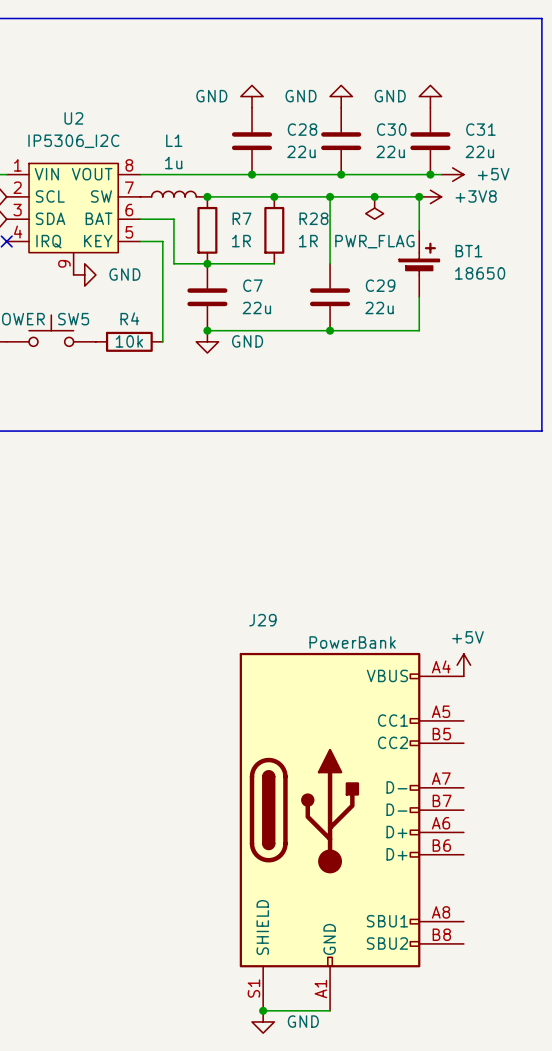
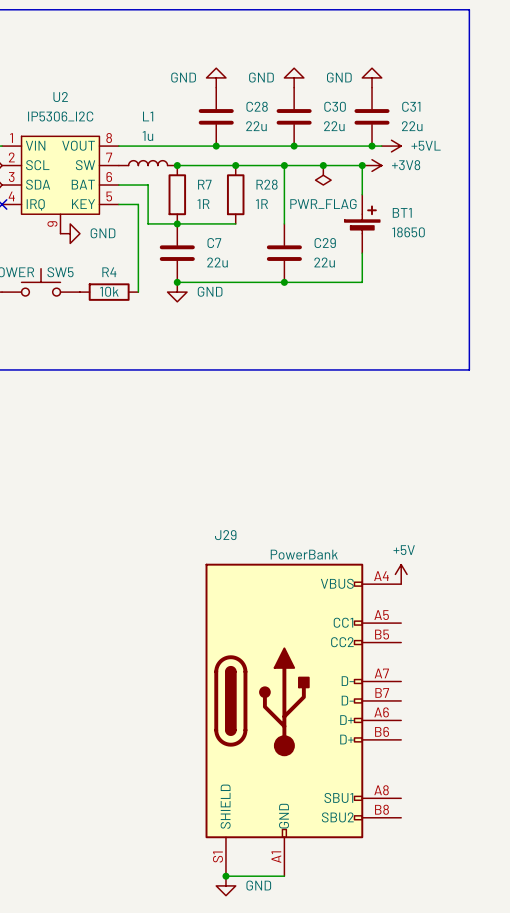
power symbol: +5V (452, 174) -> +5VL (391, 146)

